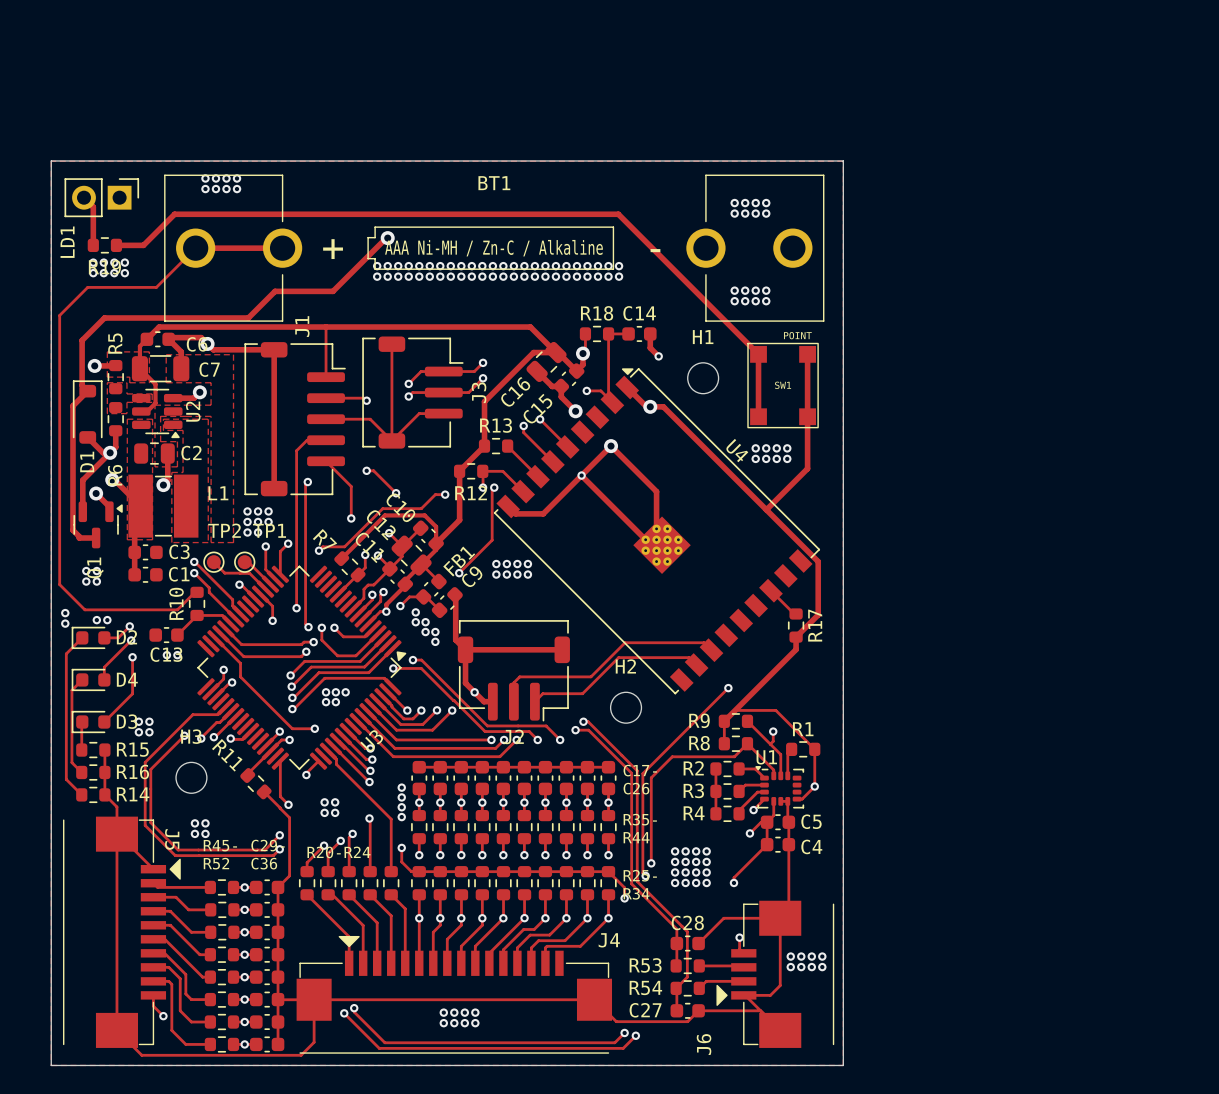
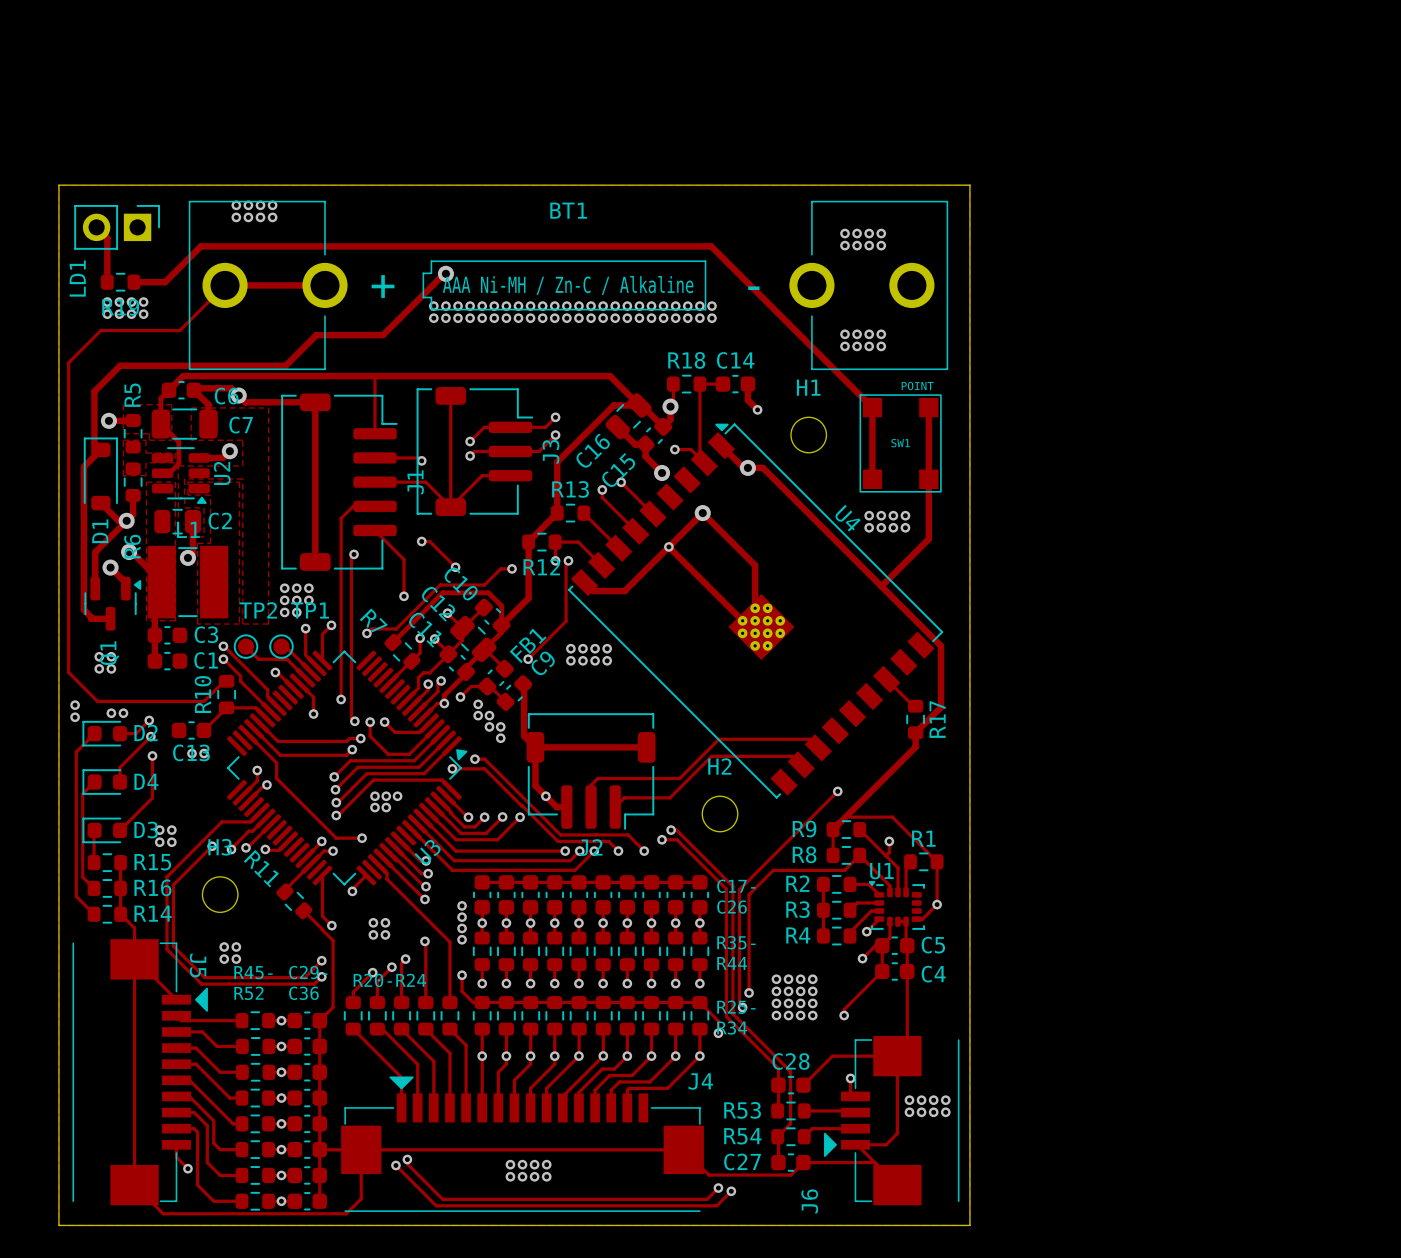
J1 name position: J1 (302, 326) -> J1 (415, 482)
L1 name position: L1 (218, 493) -> L1 (188, 529)

